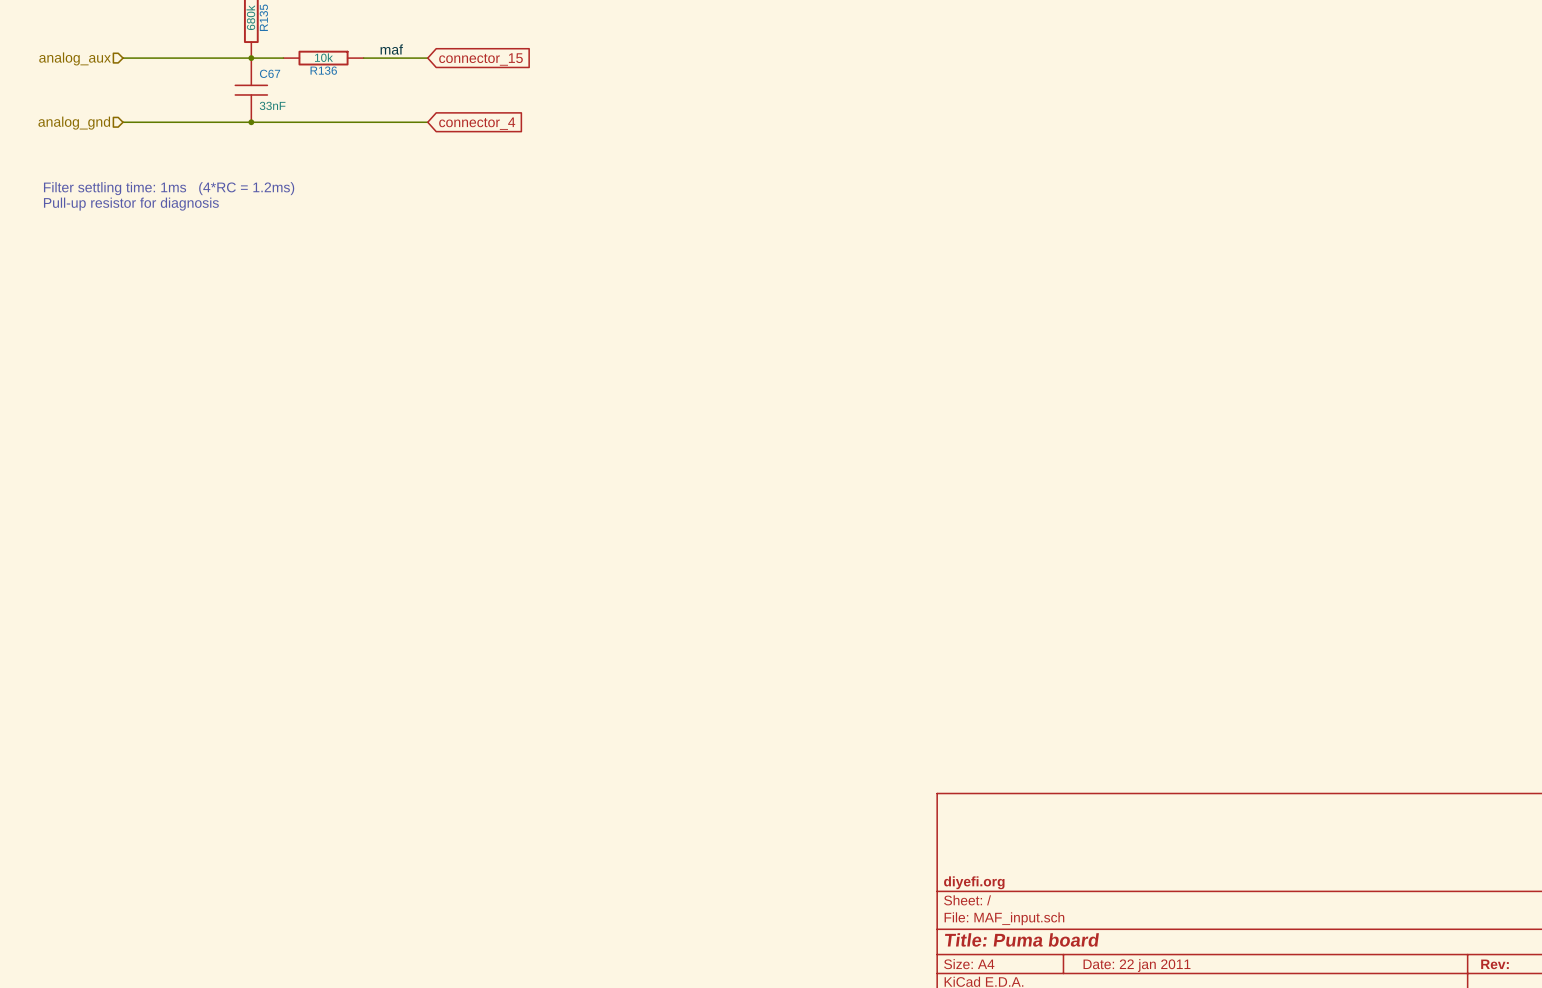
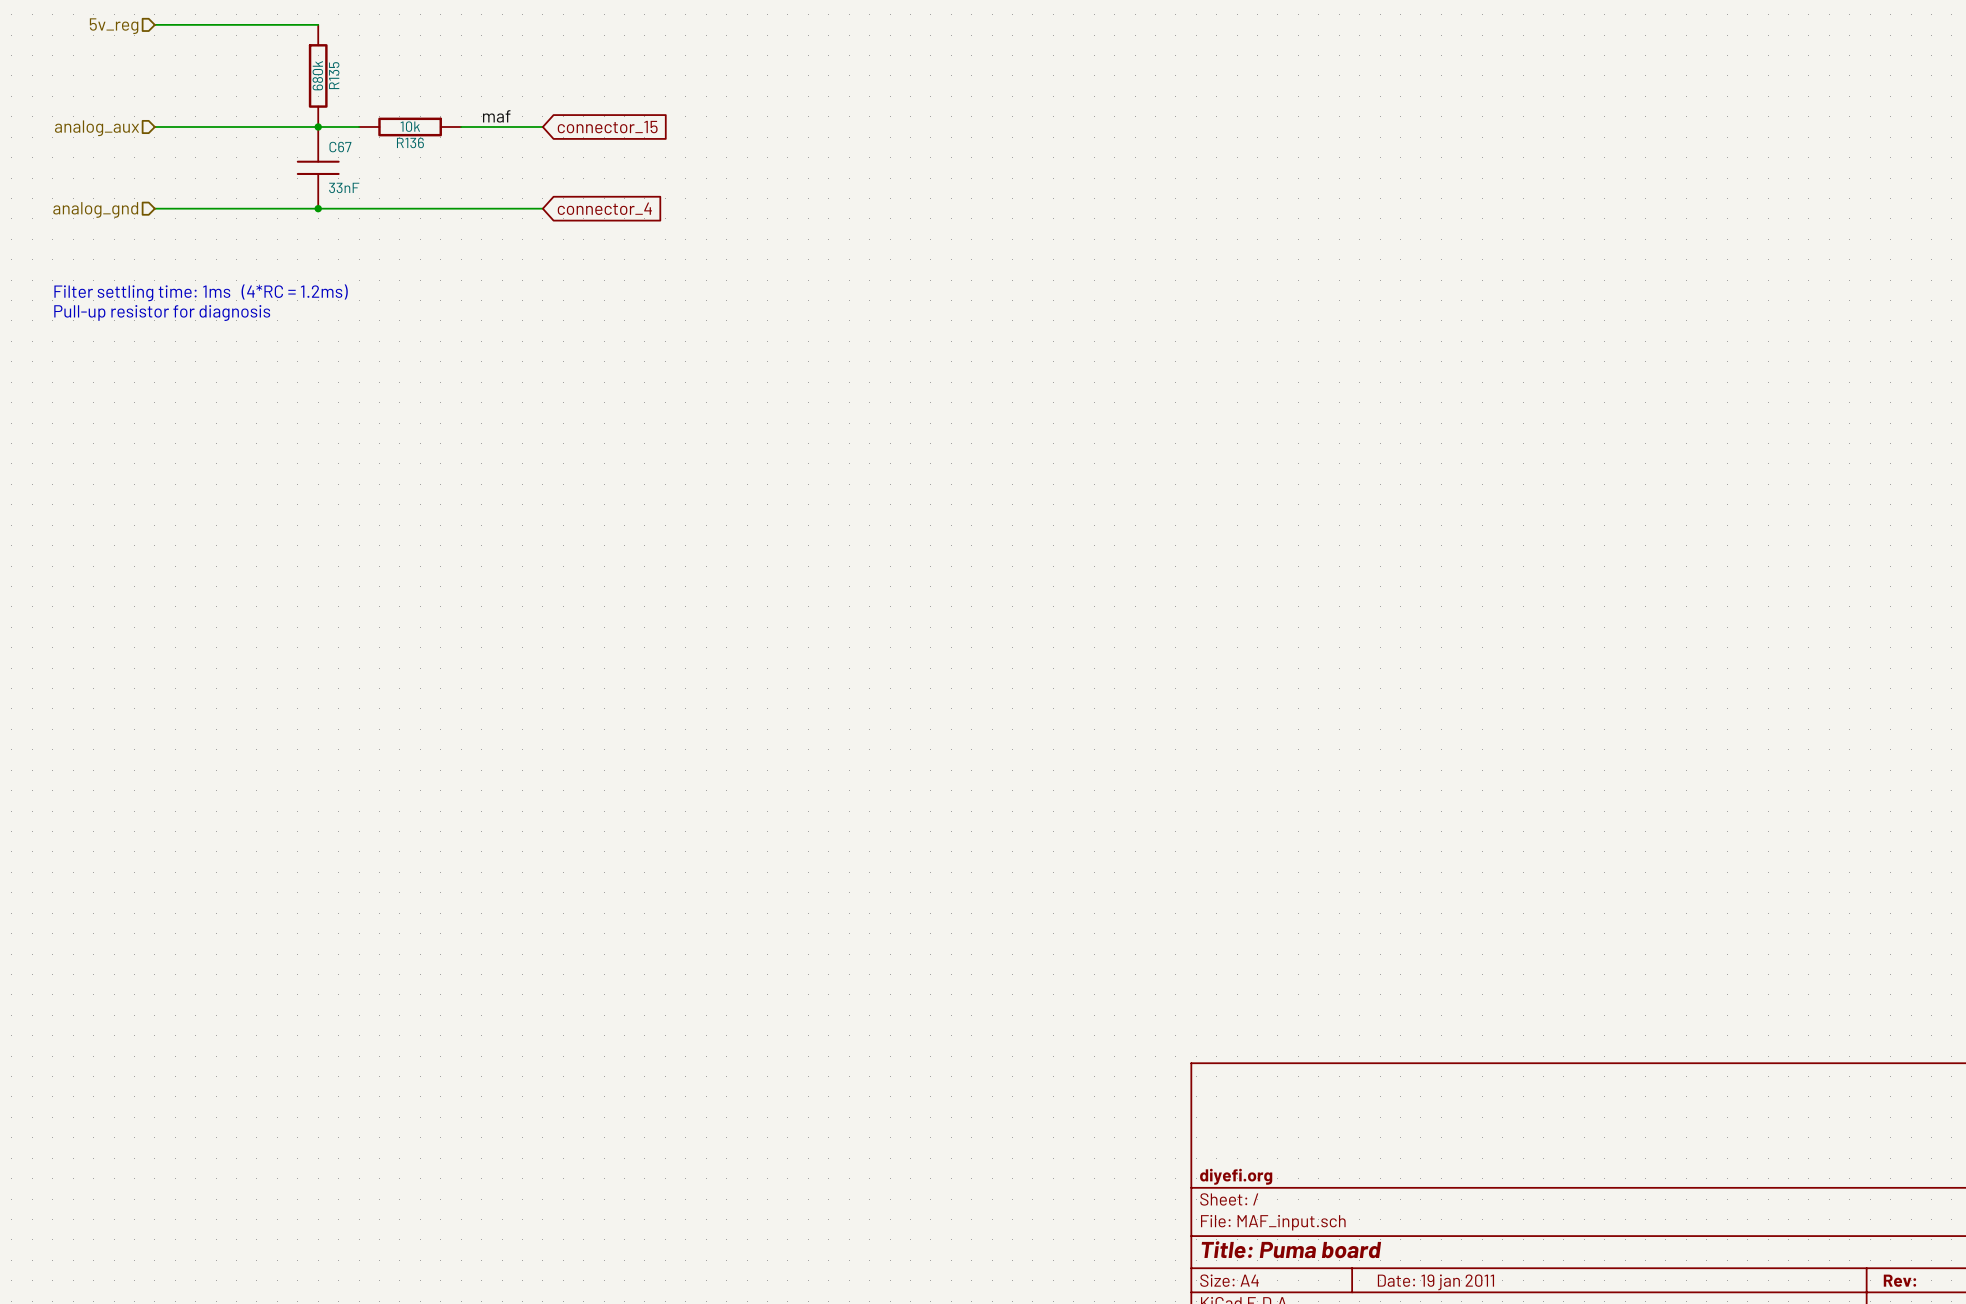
title block: Date: 22 jan 2011 (1137, 965) -> Date: 19 jan 2011 (1435, 1282)

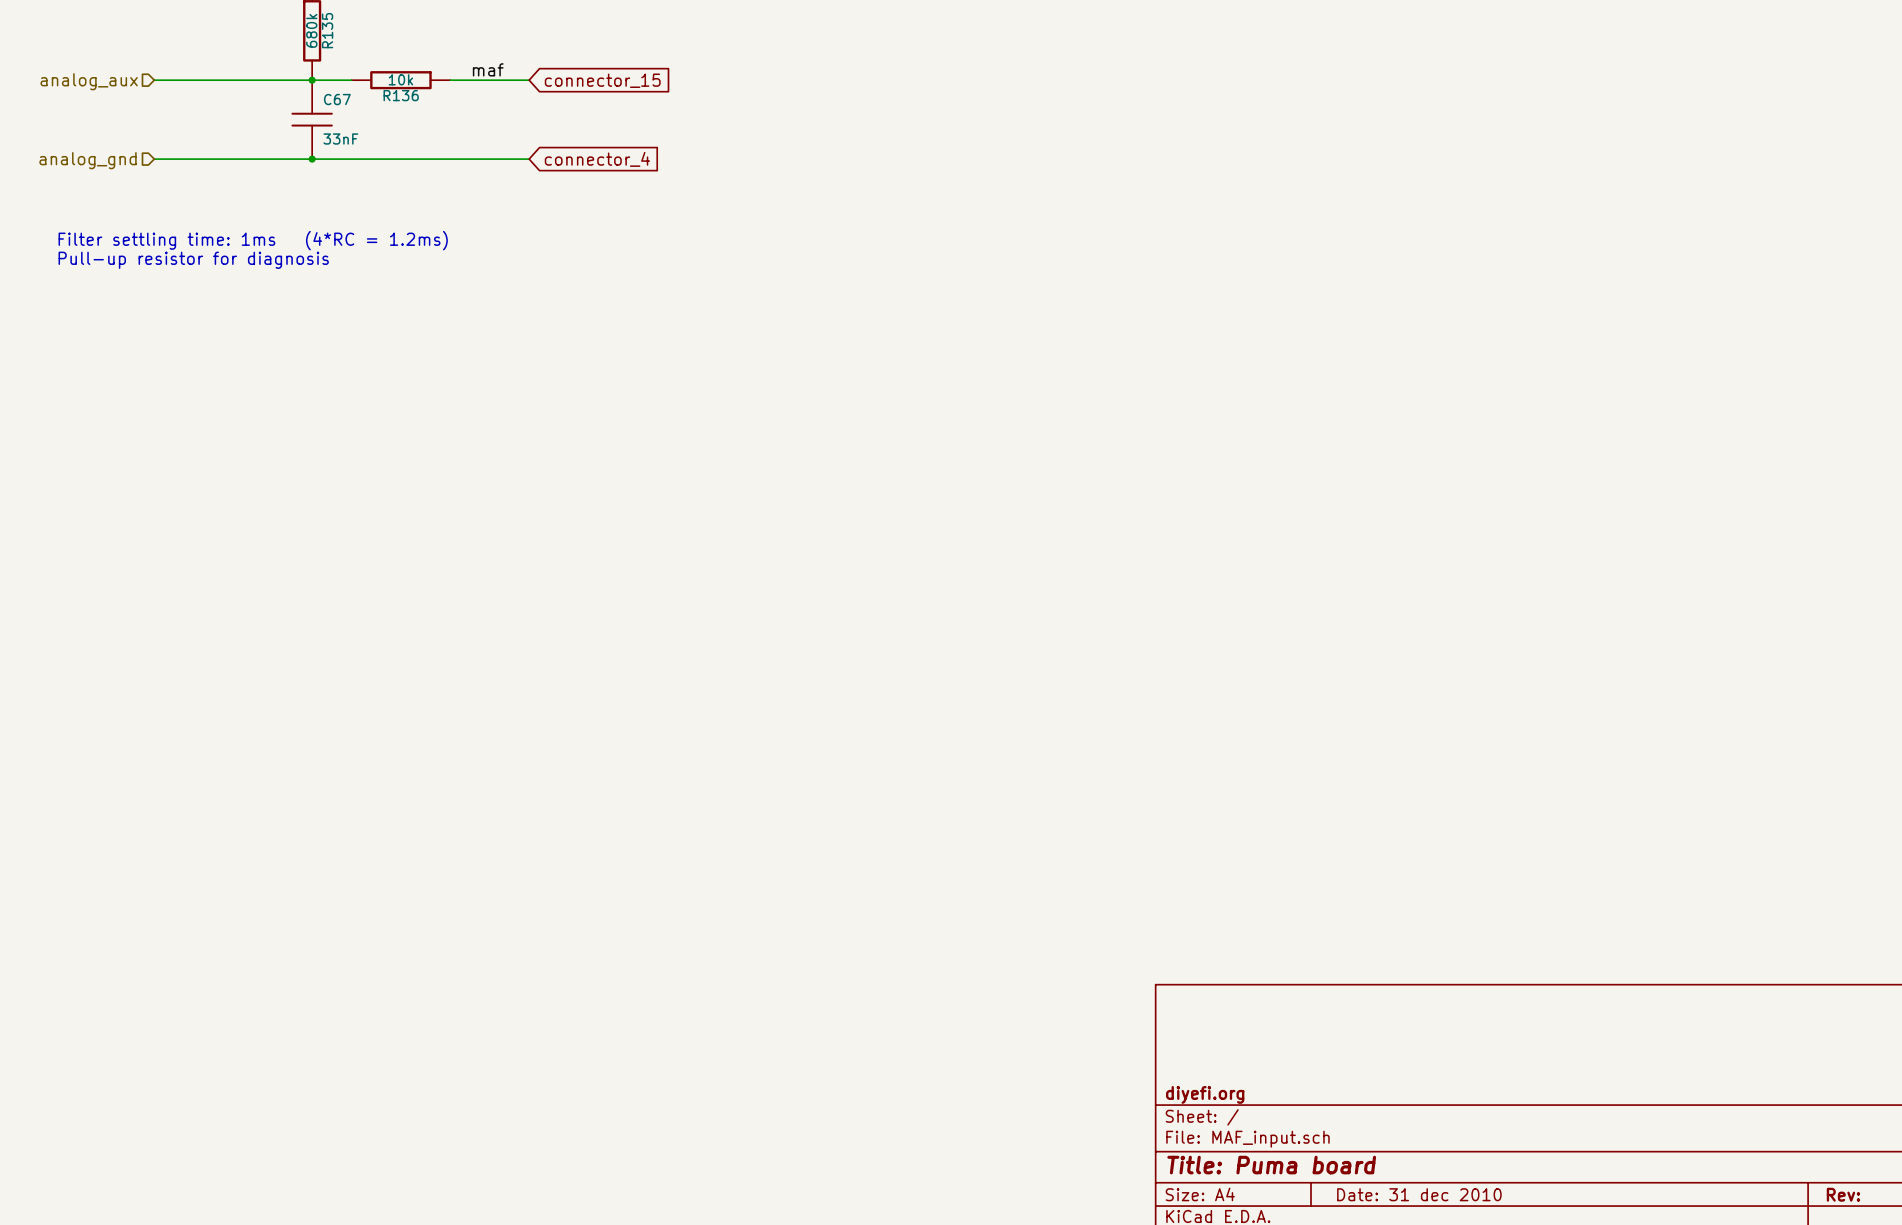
title block: Date: 19 jan 2011 (1435, 1282) -> Date: 31 dec 2010 (1419, 1194)

